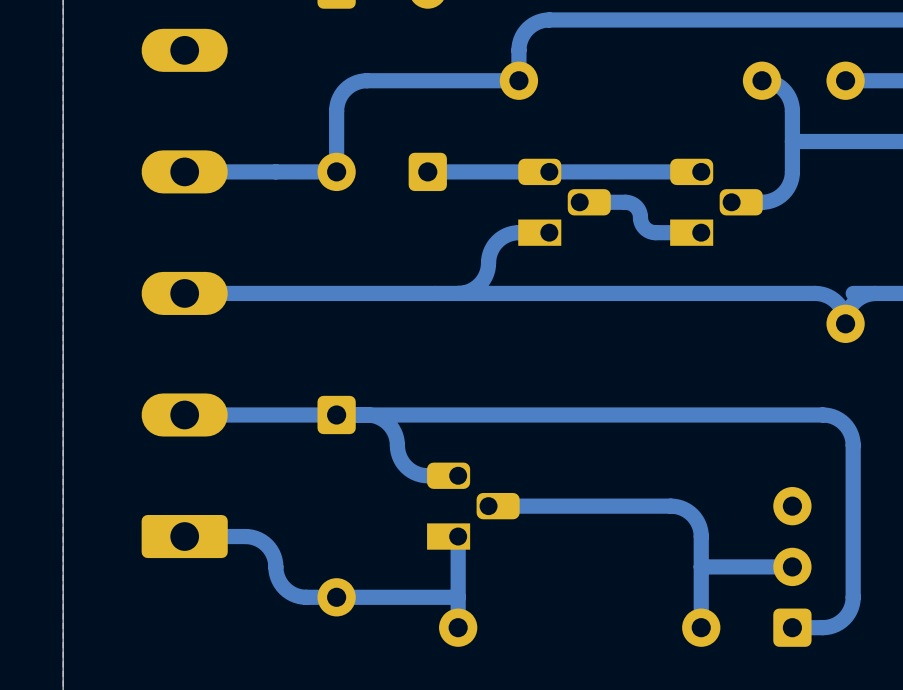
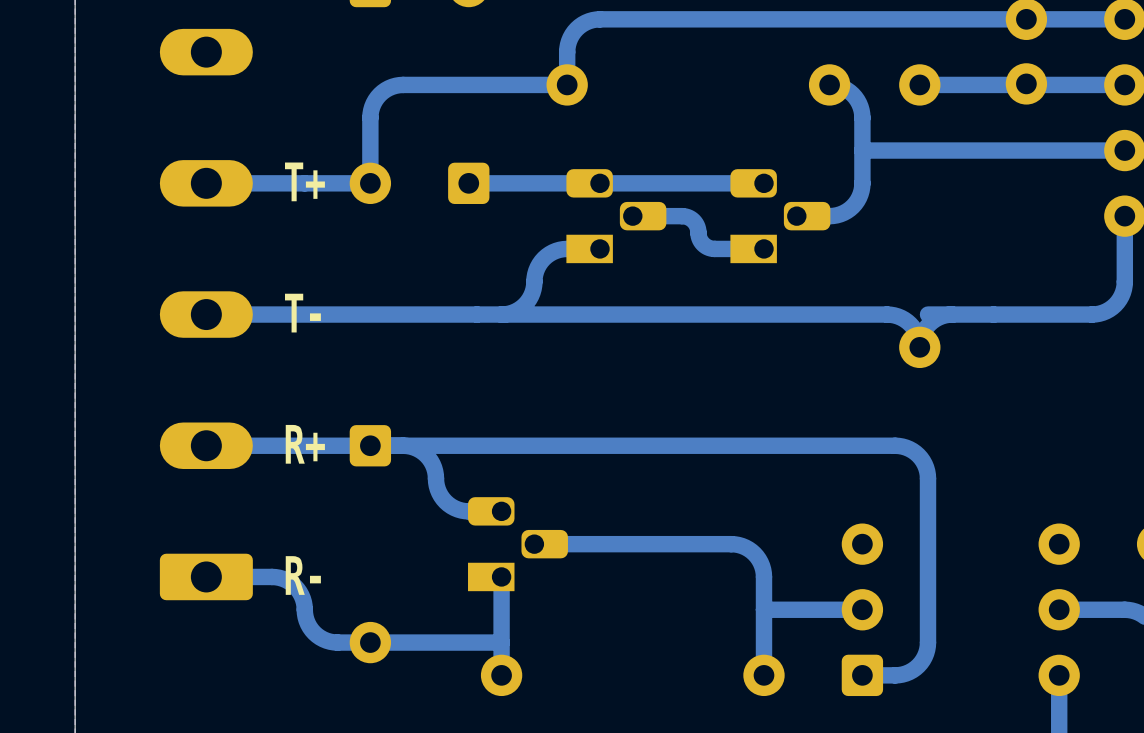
text: none -> T+ (304, 181)
text: none -> T- (302, 313)
text: none -> R+ (305, 444)
text: none -> R- (303, 575)

